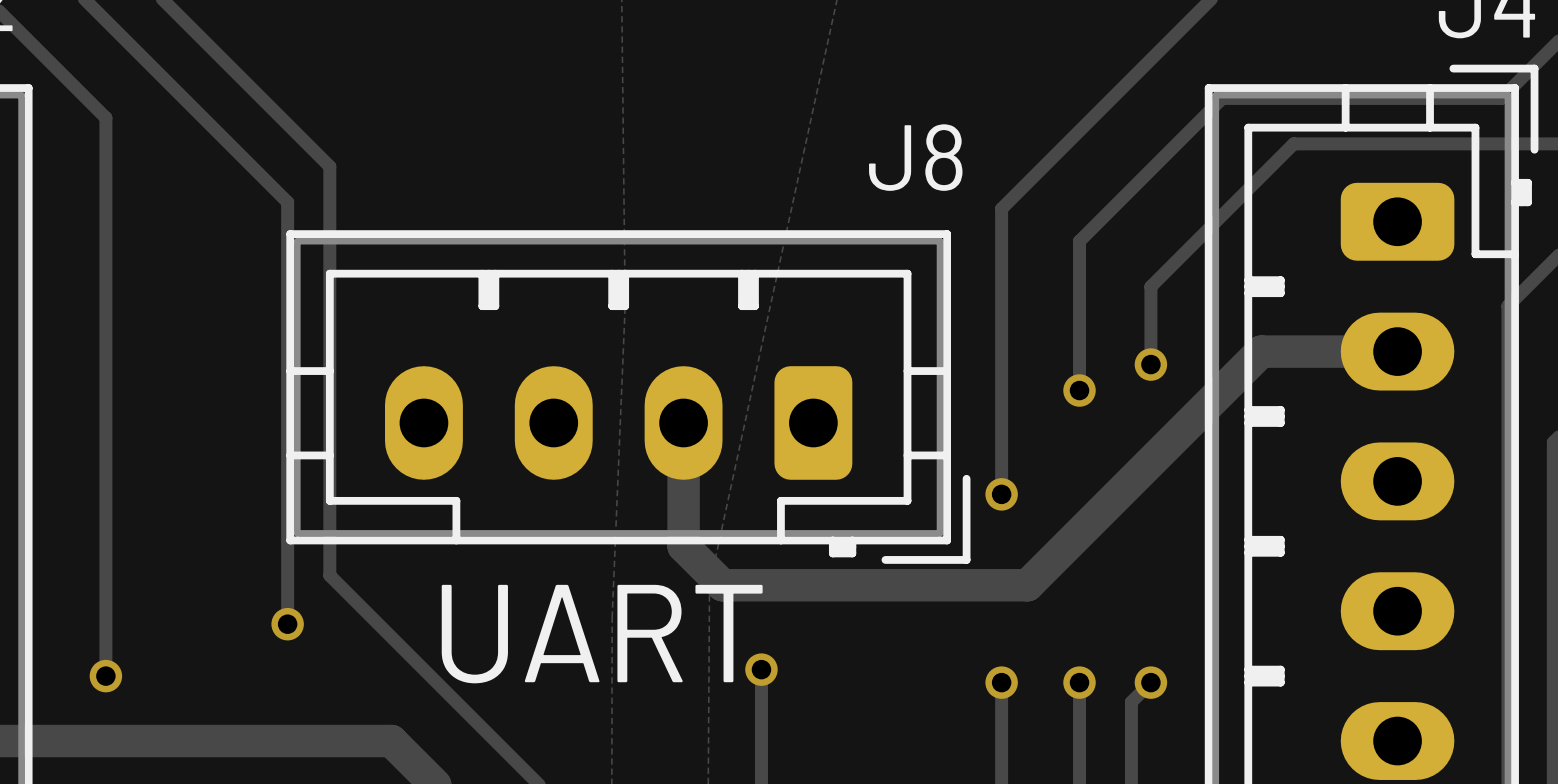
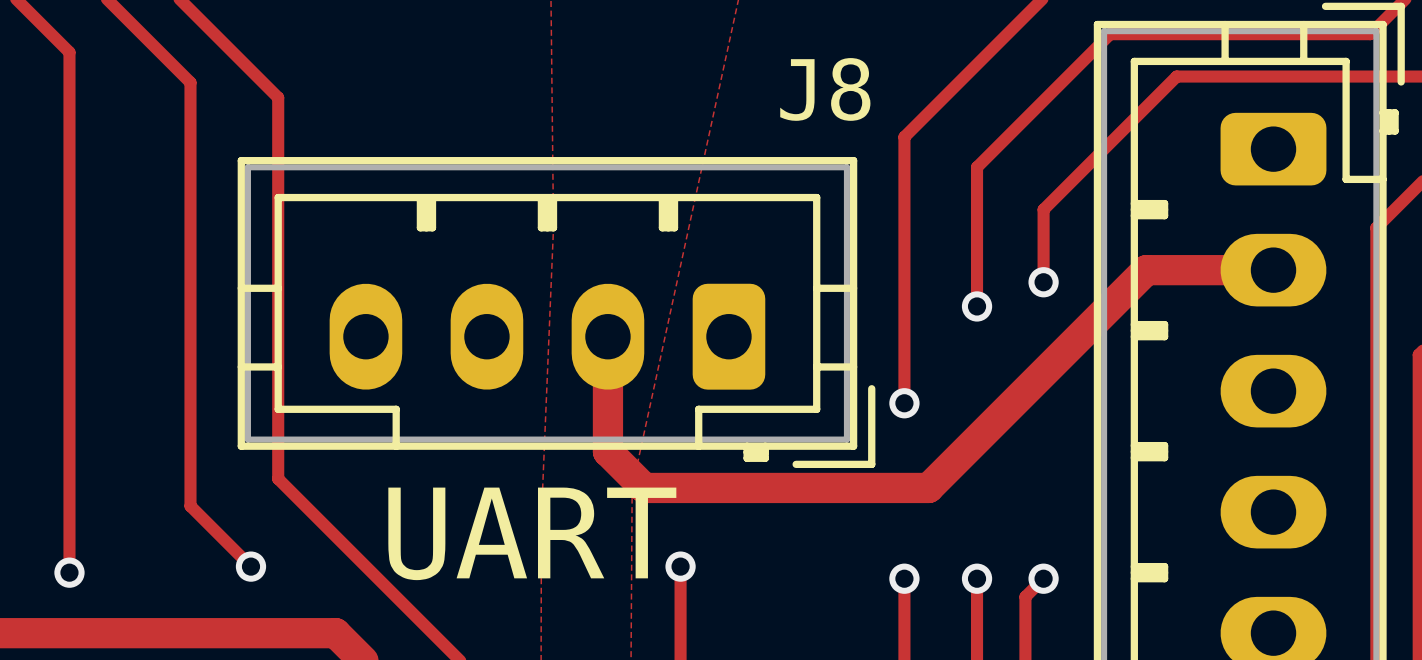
track: (235, 150) (287, 202) (287, 624) -> (190, 82) (190, 506) (250, 566)
via position: (287, 624) -> (250, 566)

